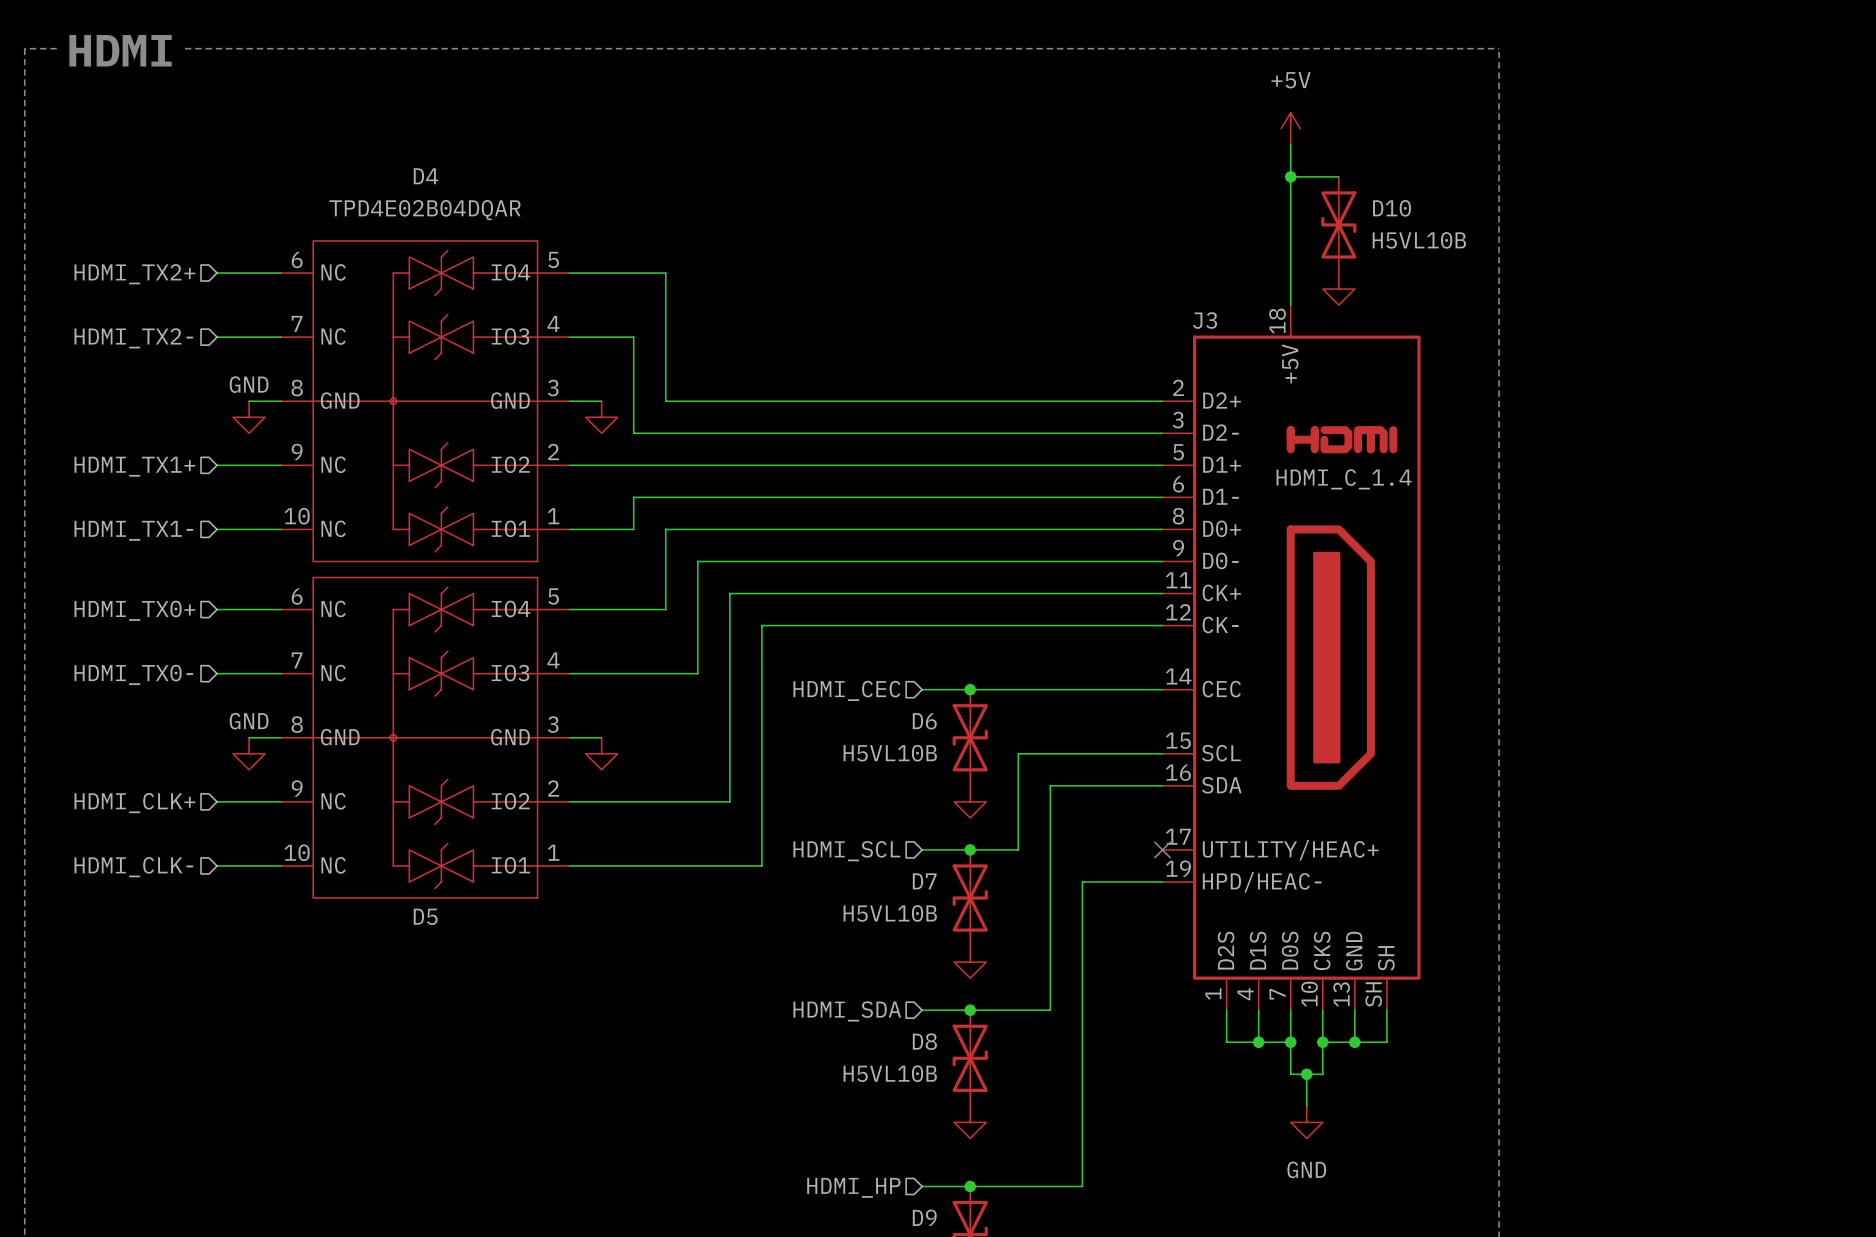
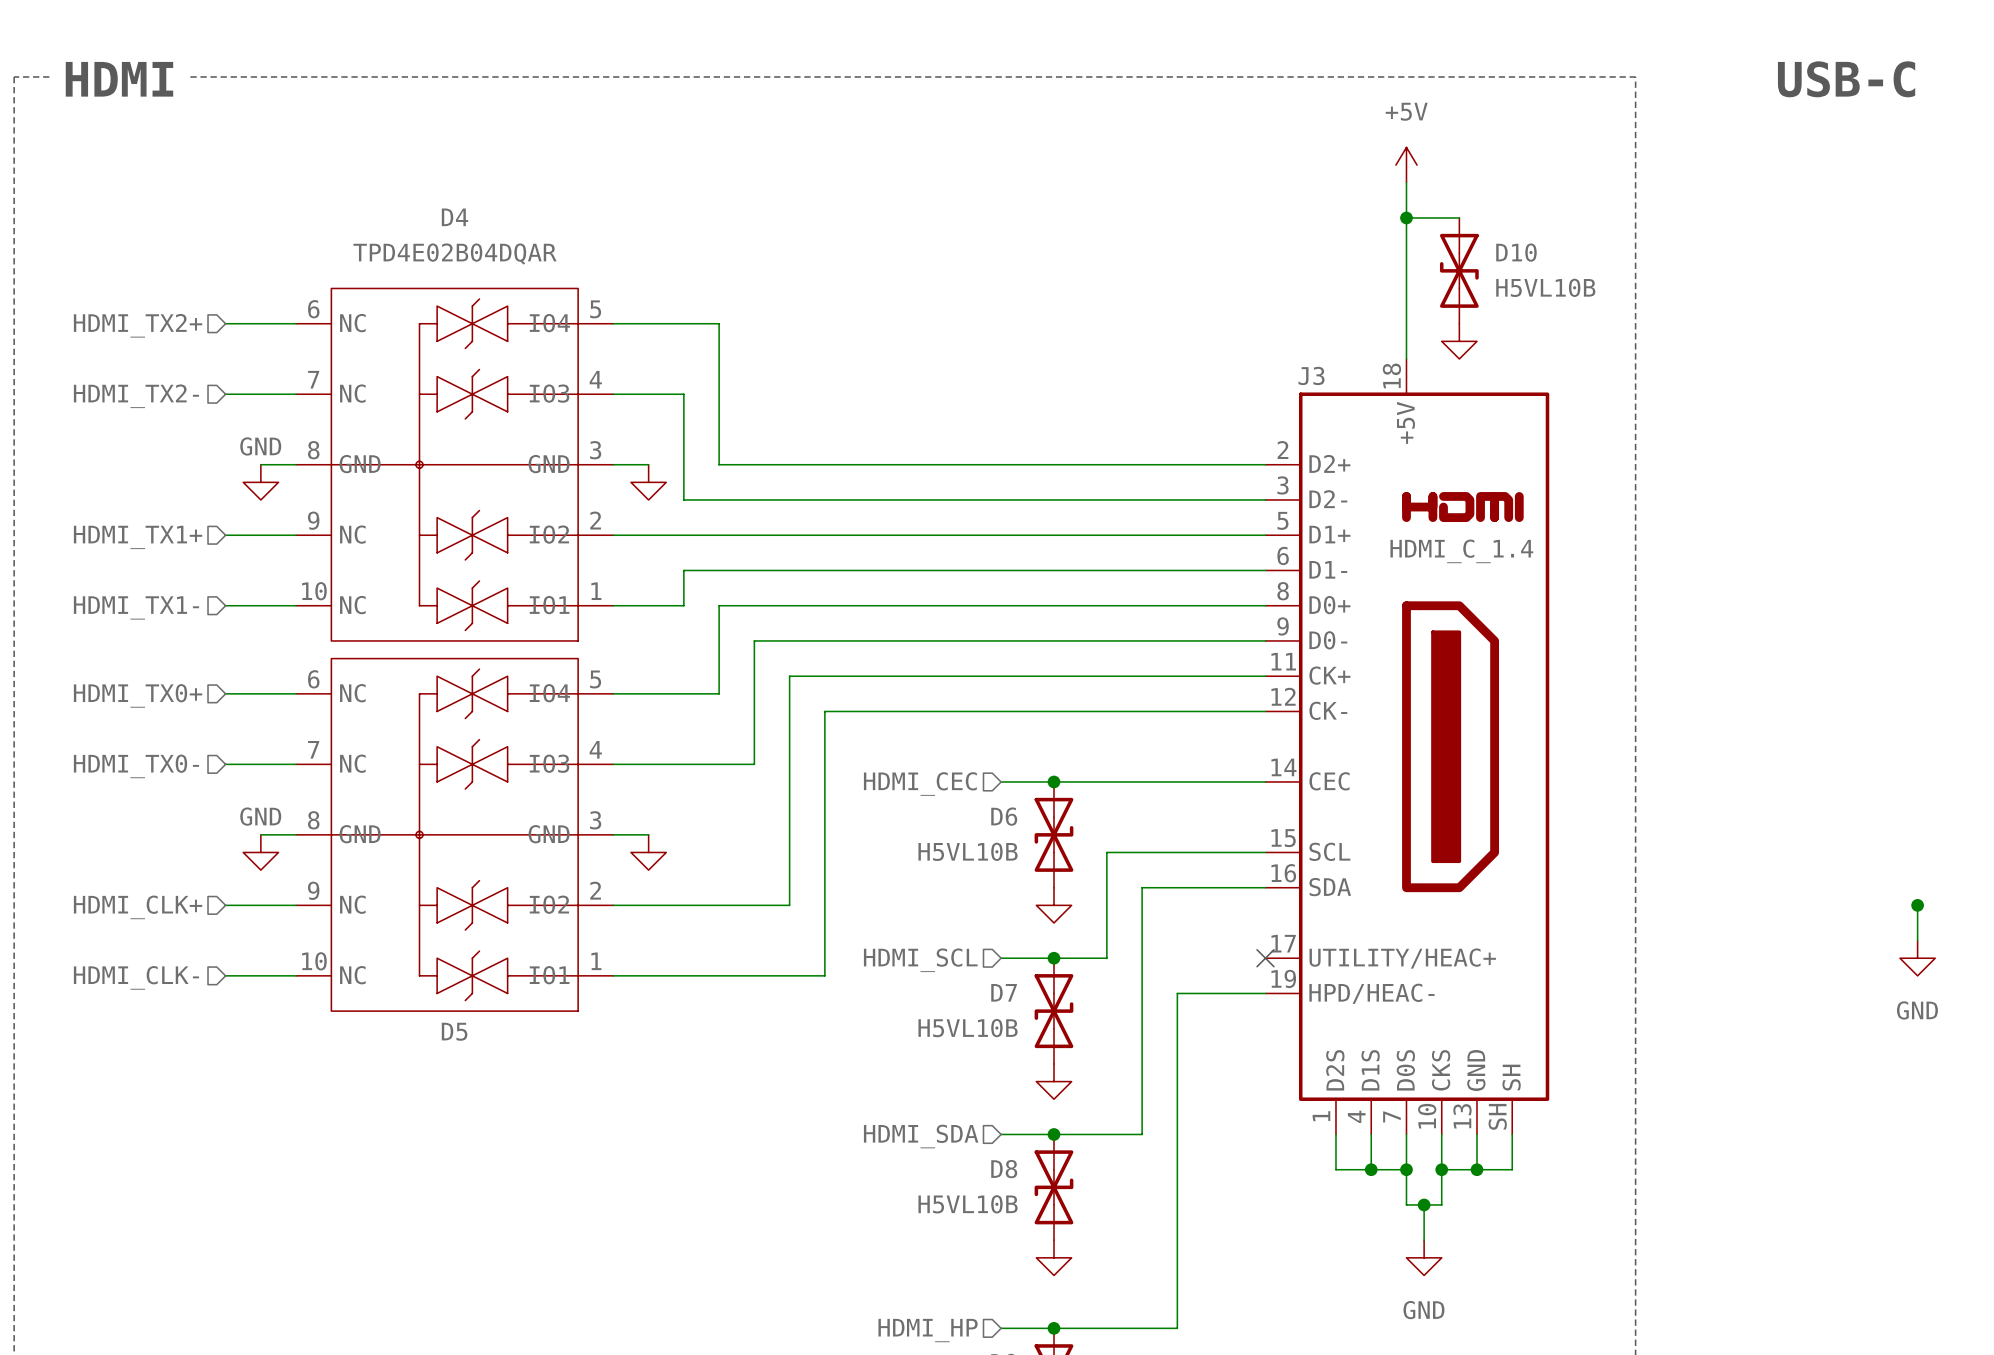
text: none -> USB-C (1846, 79)
wire: none -> (1917, 905) (1917, 940)
junction: none -> (1917, 905)
power symbol: none -> GND (1917, 958)

